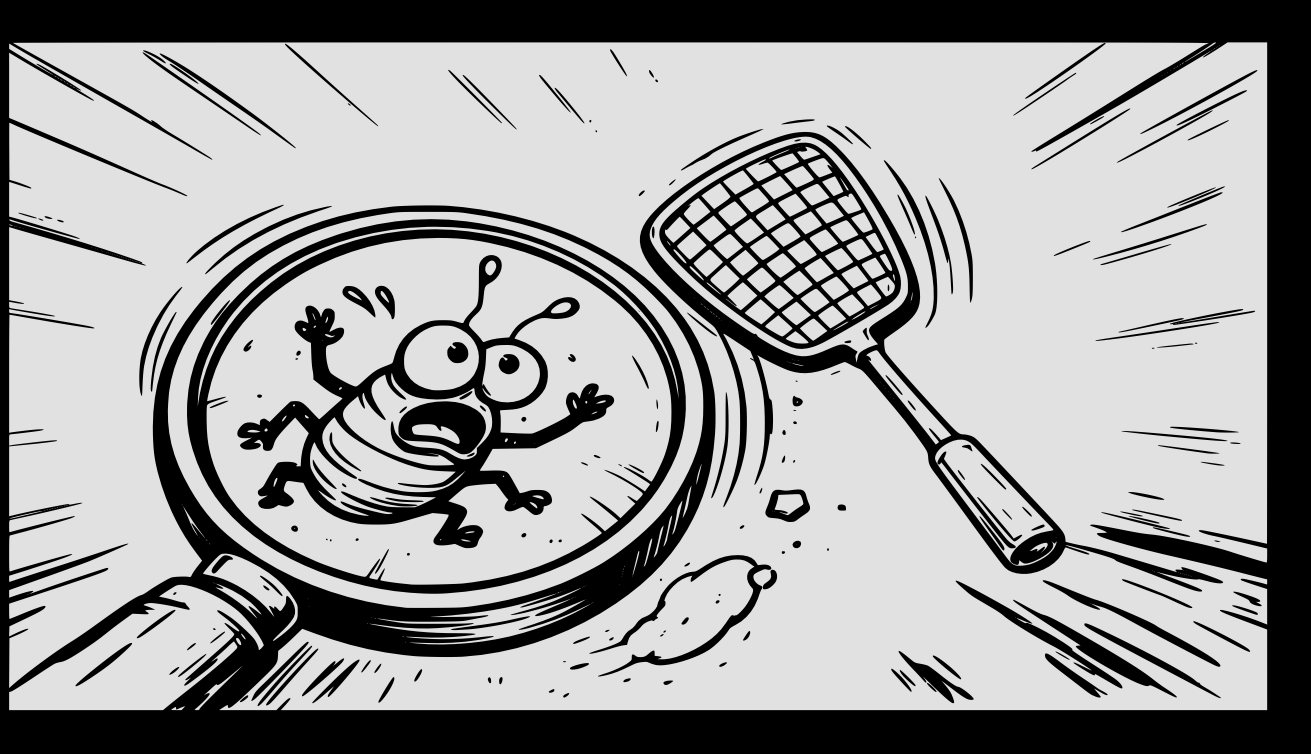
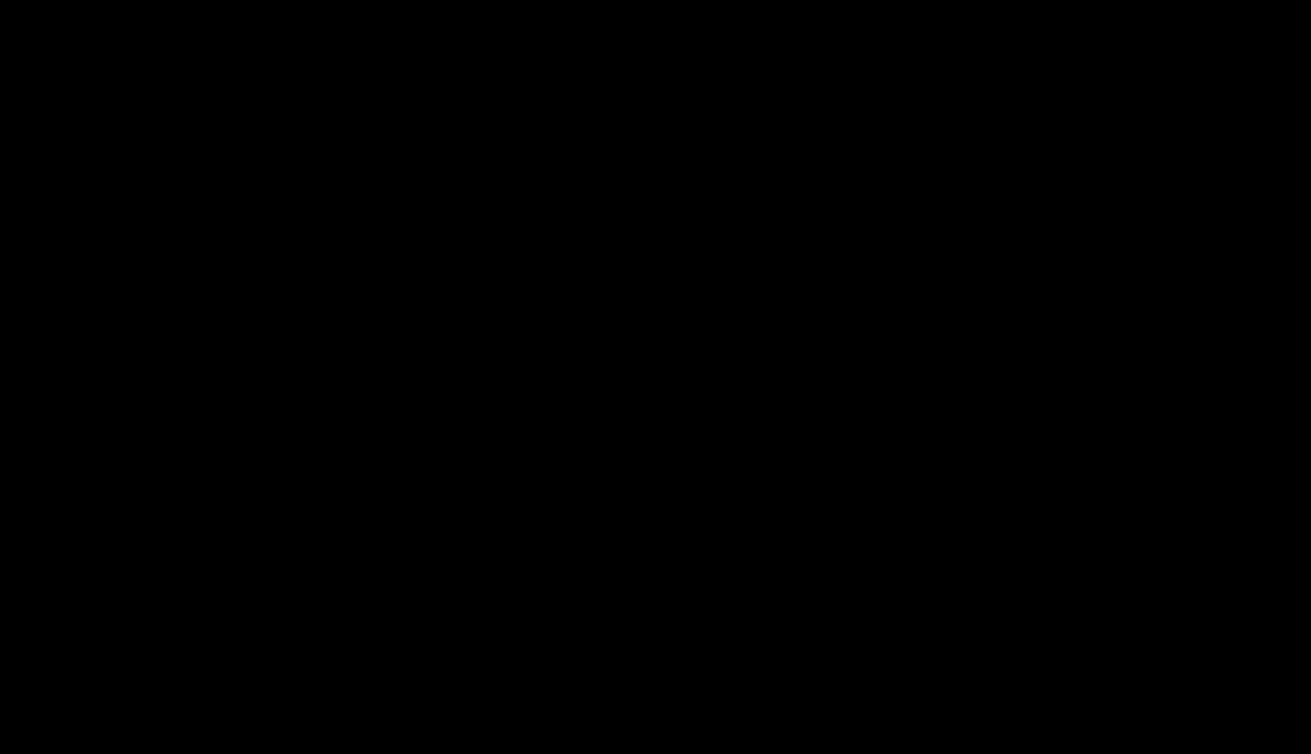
drawing: [9, 42, 1268, 711] -> none

